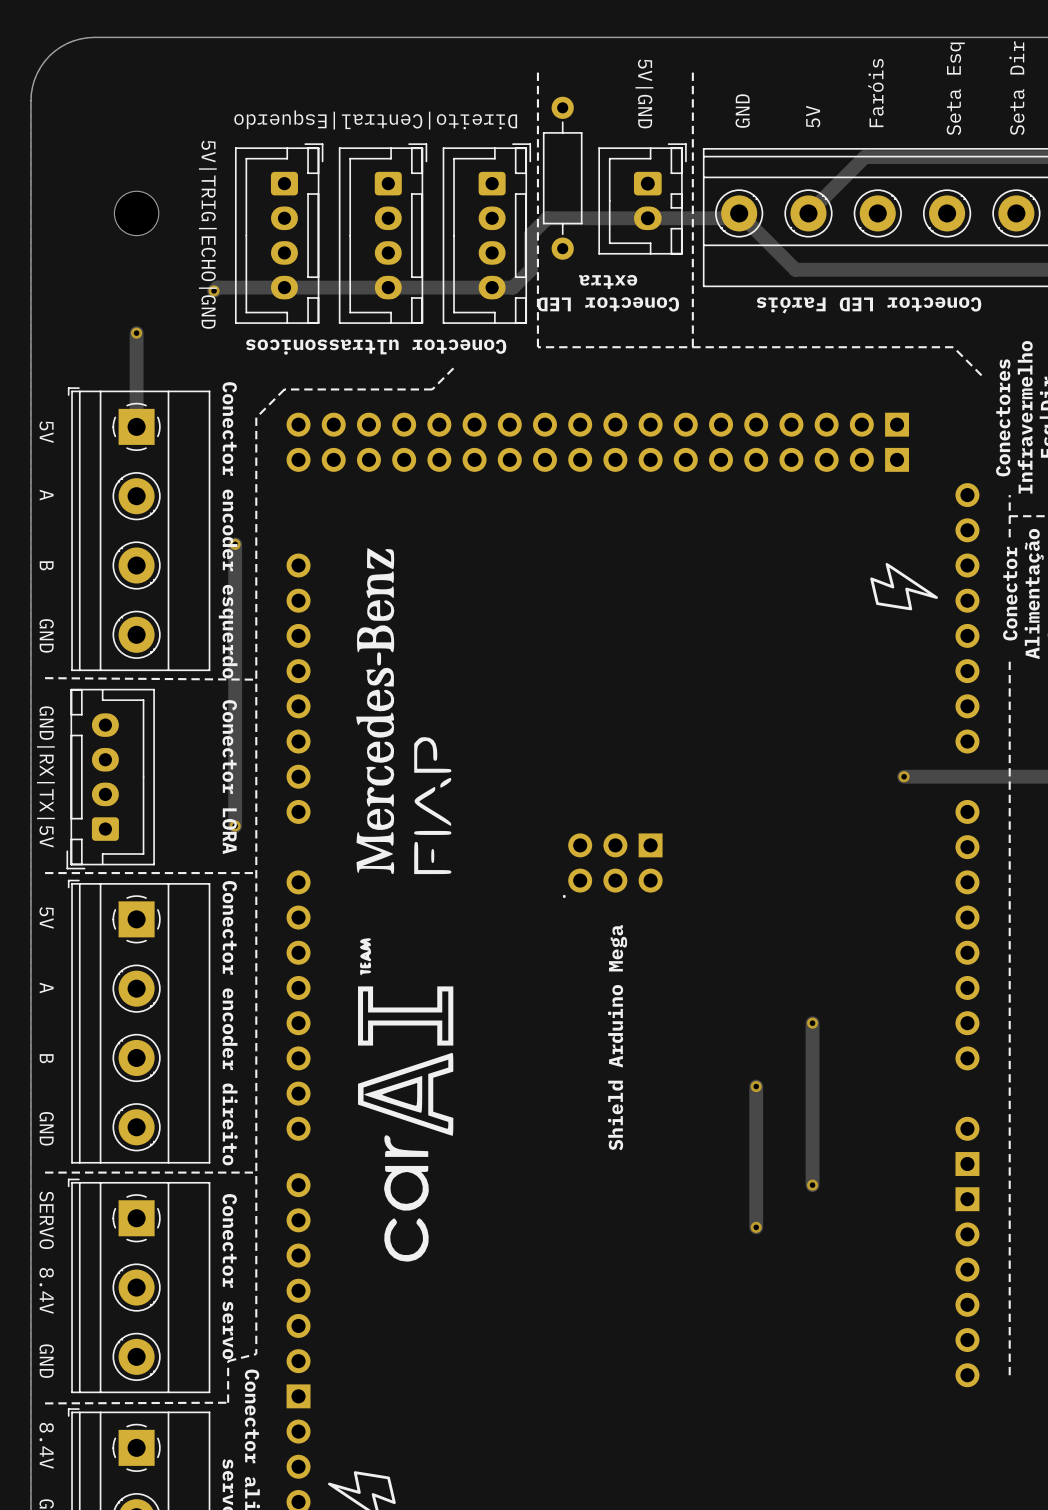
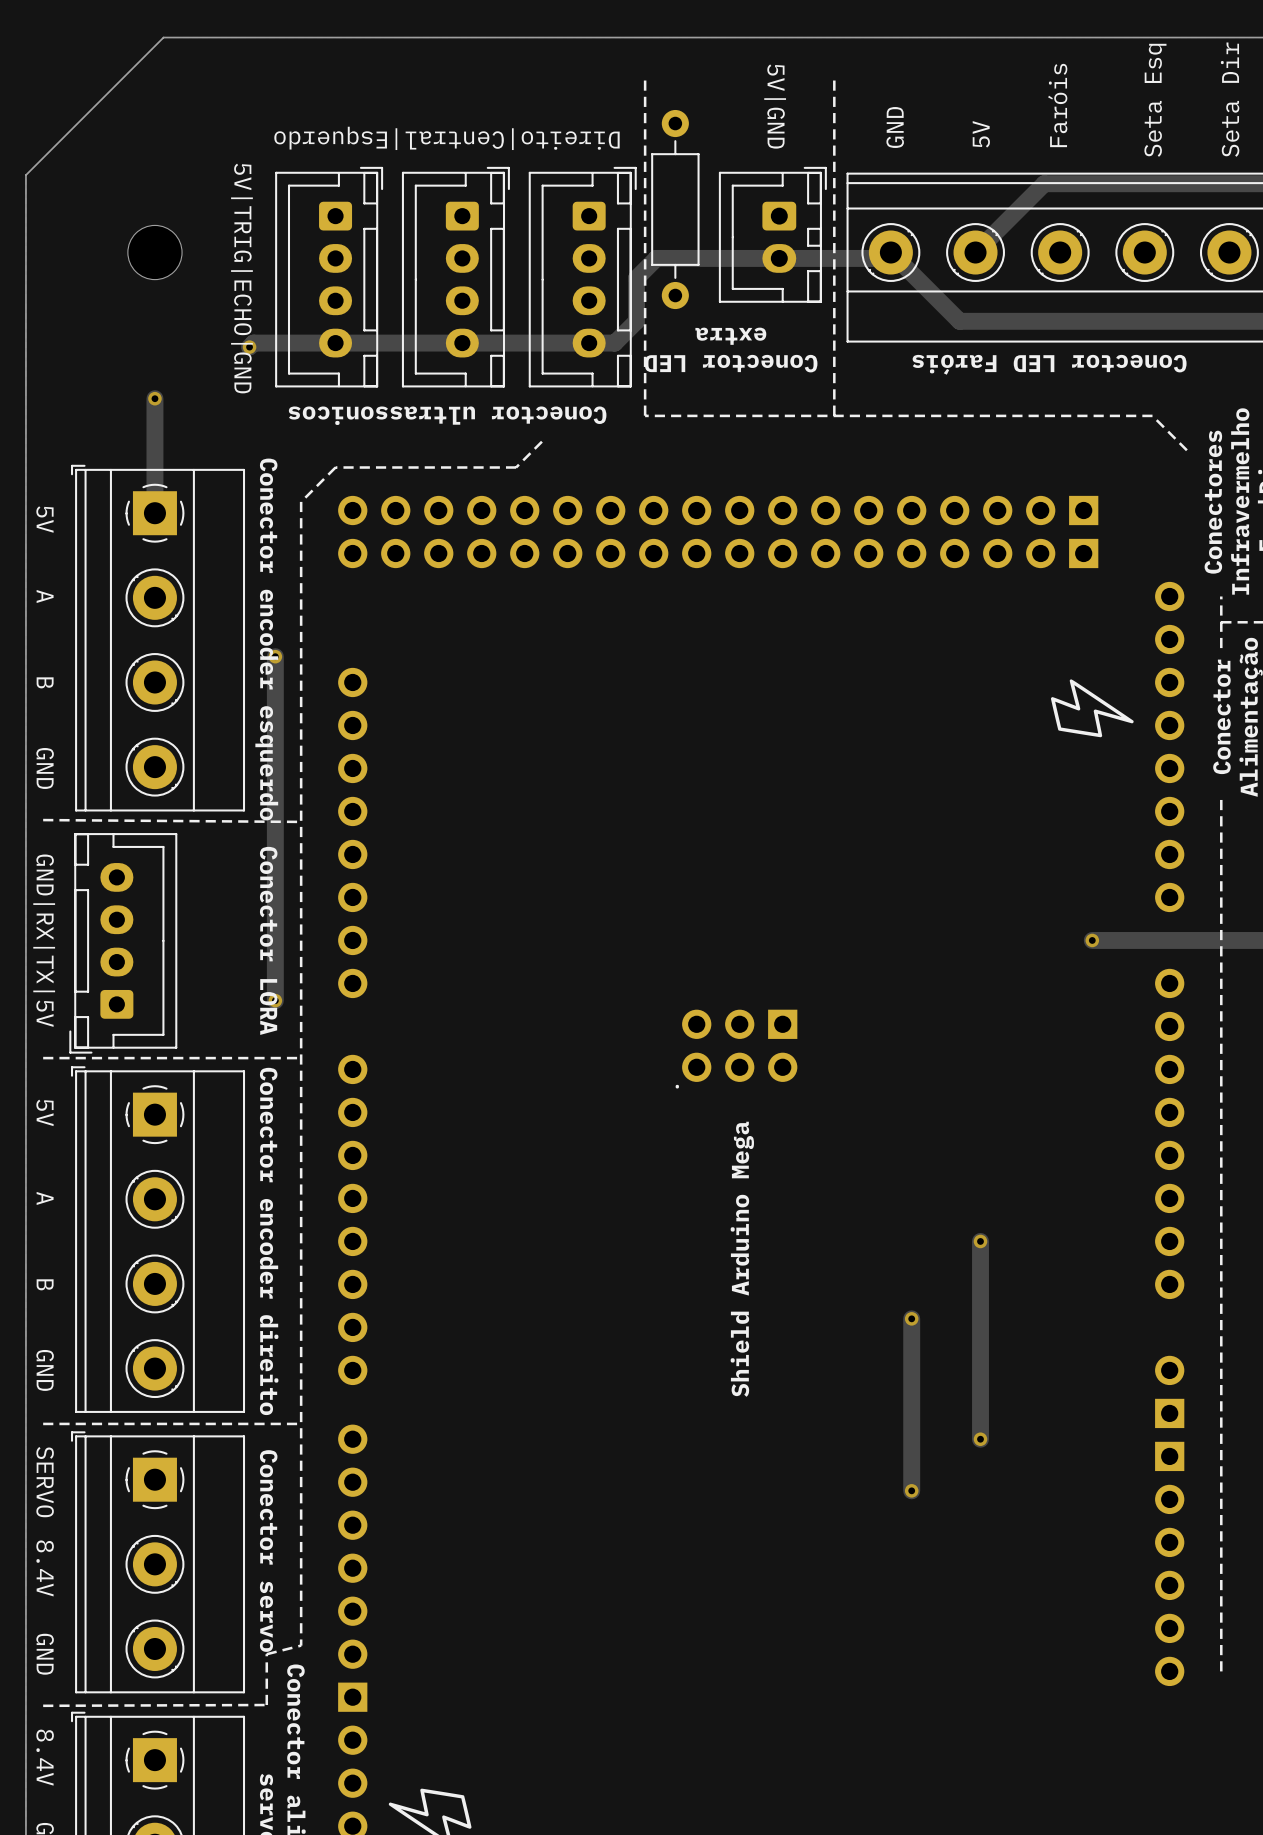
board edge: (143, 37) (80, 38) (60, 47) (49, 55) (40, 67) (32, 86) (30, 150) -> (163, 37) (25, 175)
drawing: [356, 548, 454, 1262] -> none

